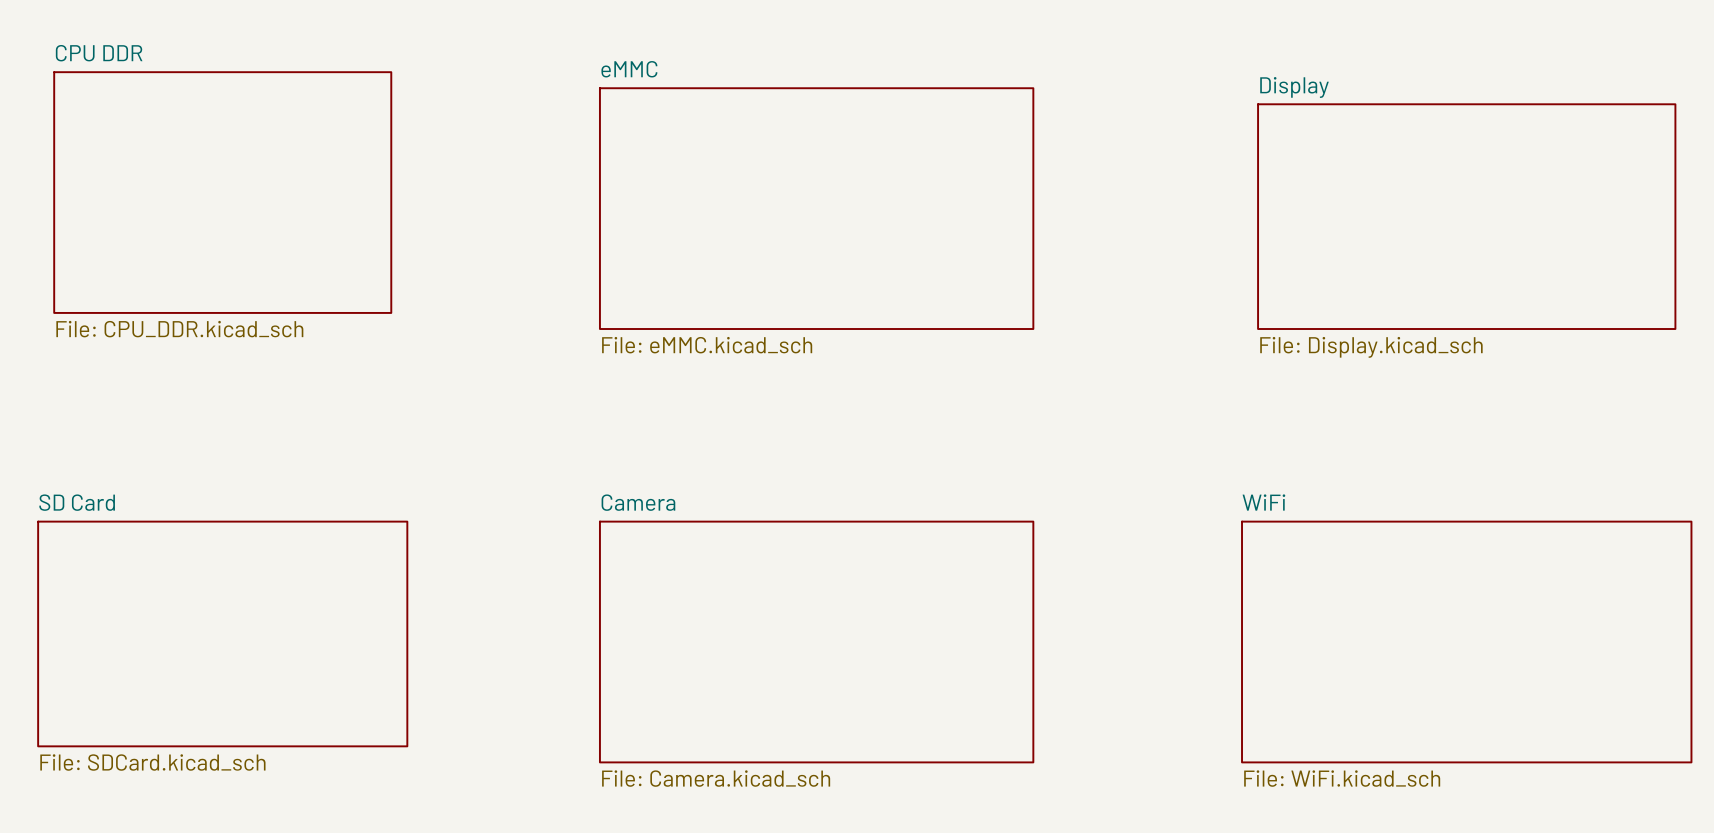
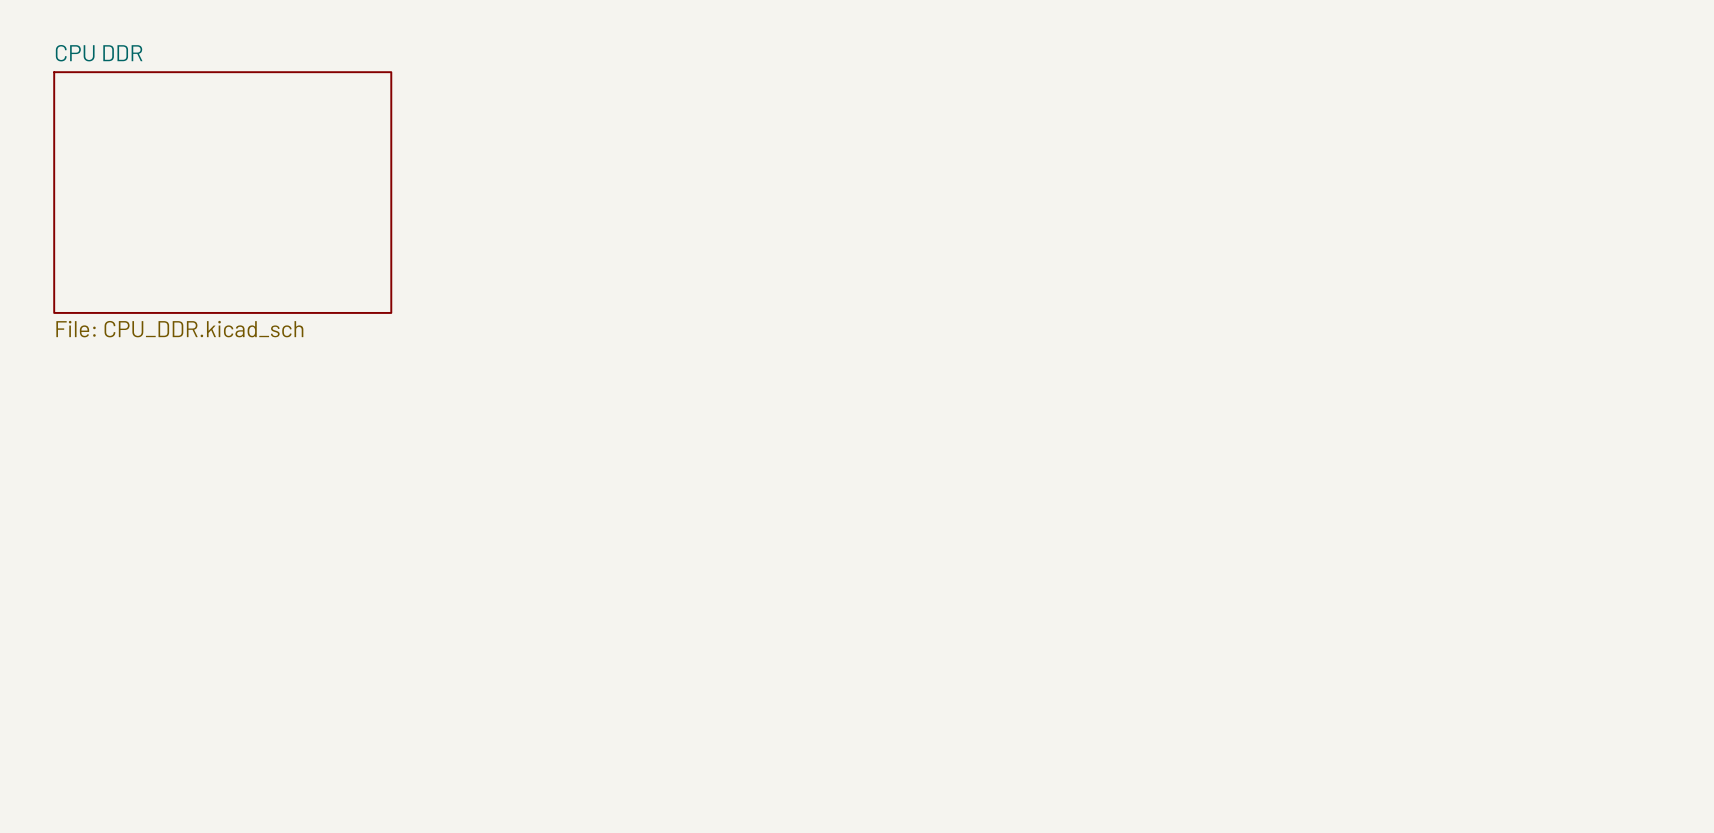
sheet eMMC: File: eMMC.kicad_sch (816, 208) -> none
sheet Display: File: Display.kicad_sch (1466, 216) -> none
sheet SD Card: File: SDCard.kicad_sch (222, 633) -> none
sheet Camera: File: Camera.kicad_sch (816, 642) -> none
sheet WiFi: File: WiFi.kicad_sch (1466, 642) -> none

